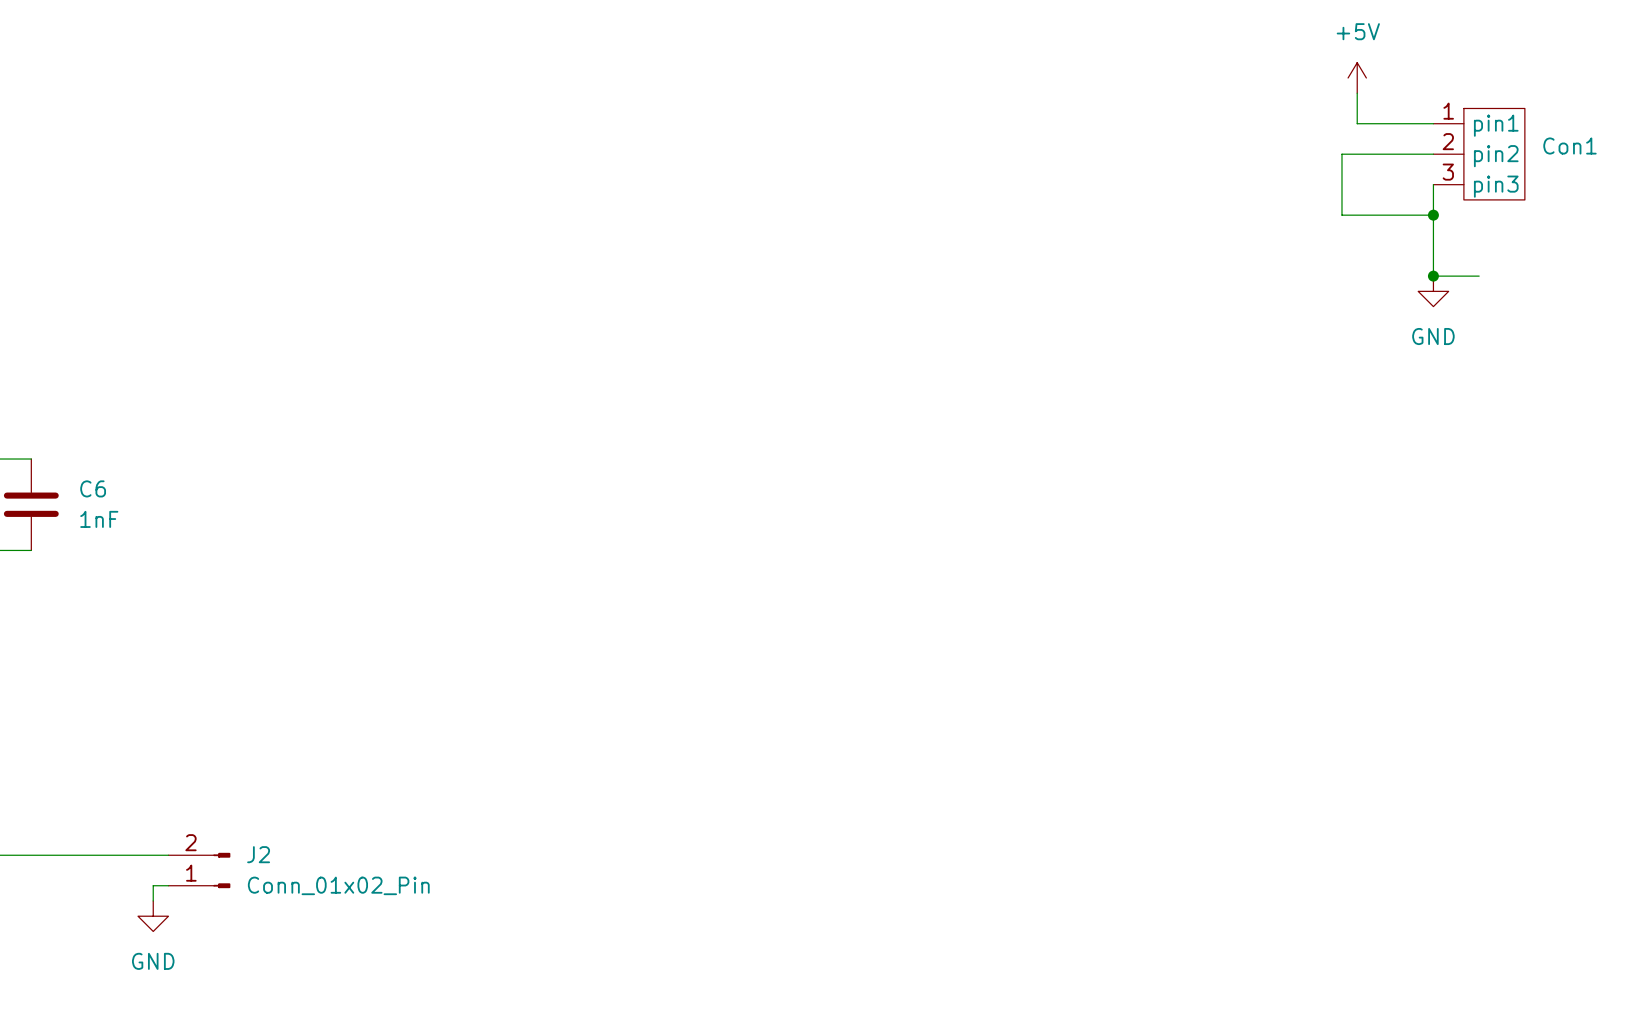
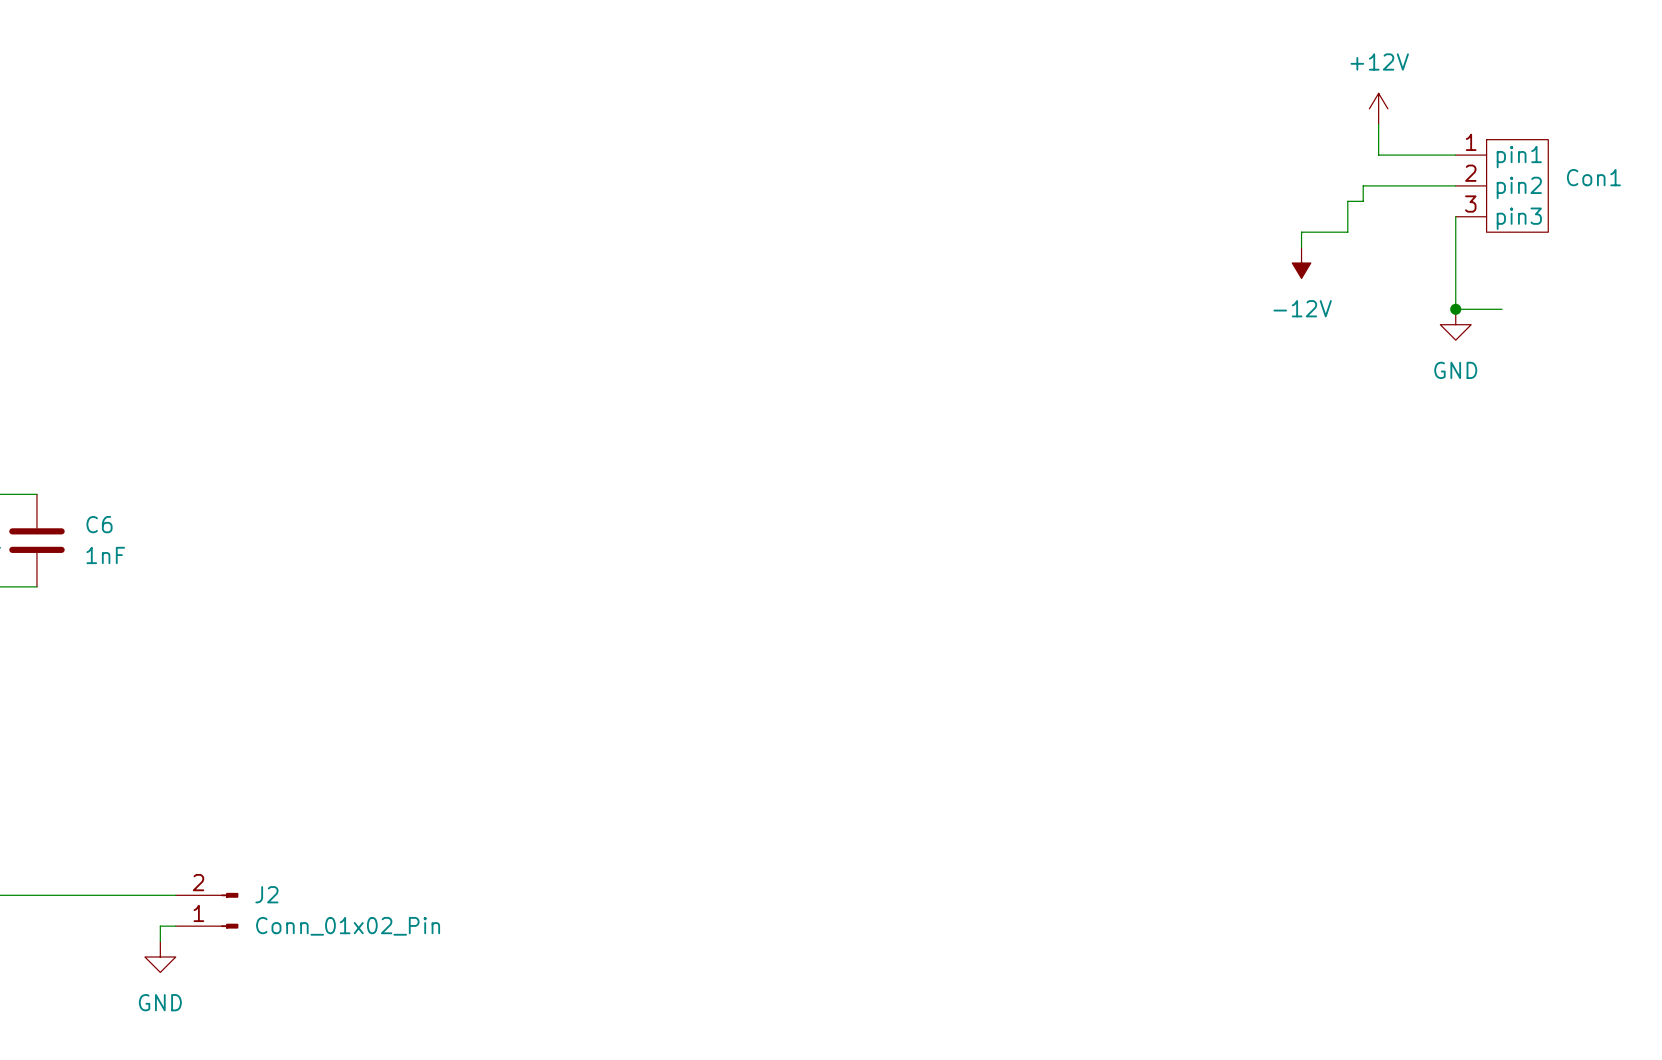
power symbol: +5V (1357, 78) -> +12V (1378, 108)
wire: (1341, 169) (1341, 215) (1433, 215) -> (1363, 201) (1347, 201) (1347, 232) (1301, 232) (1301, 247)
junction: (1433, 215) -> none
power symbol: none -> -12V (1301, 263)

